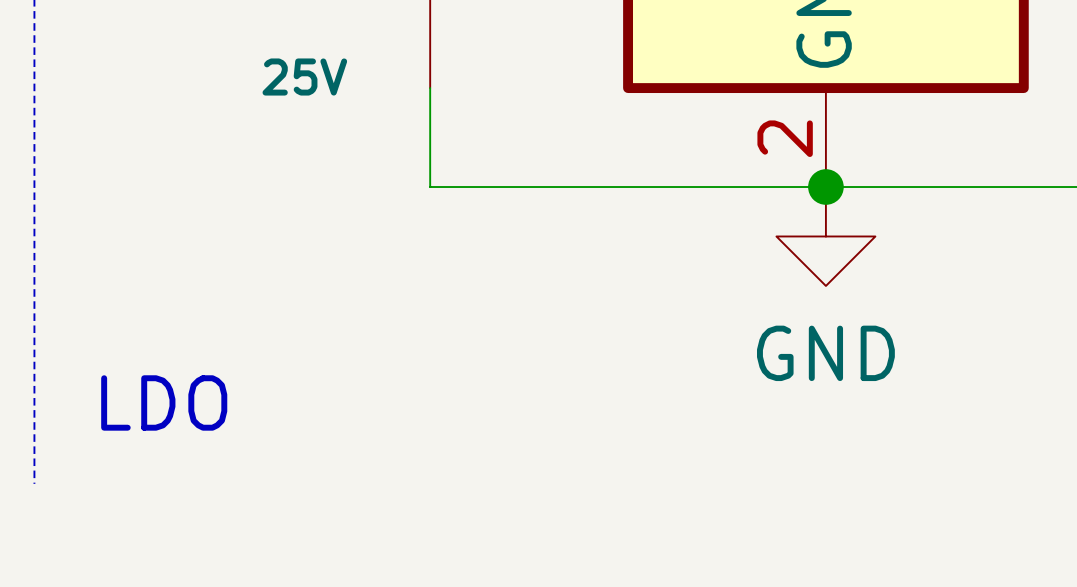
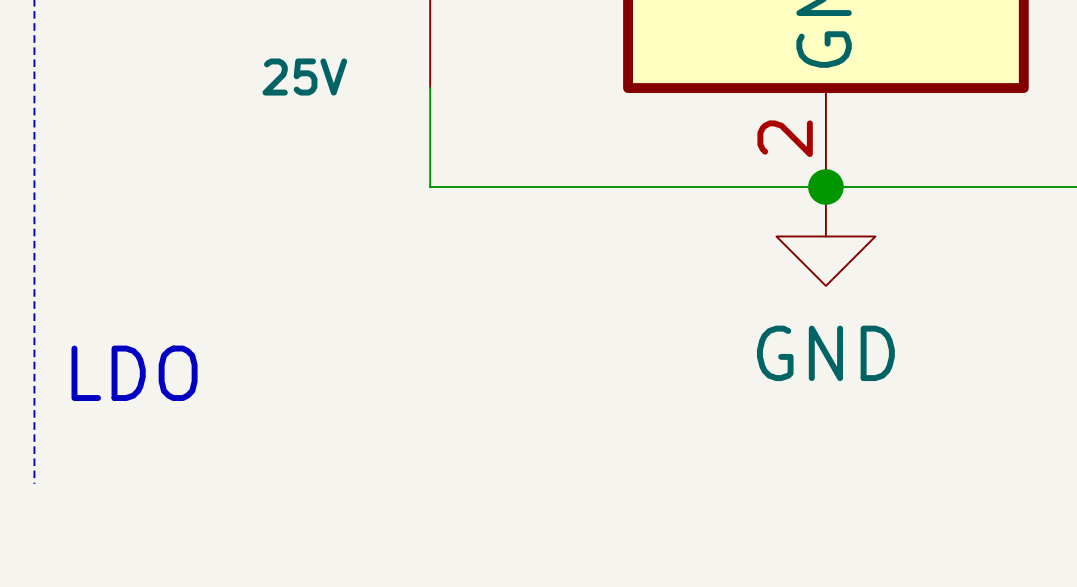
text position: LDO (164, 402) -> LDO (134, 373)

